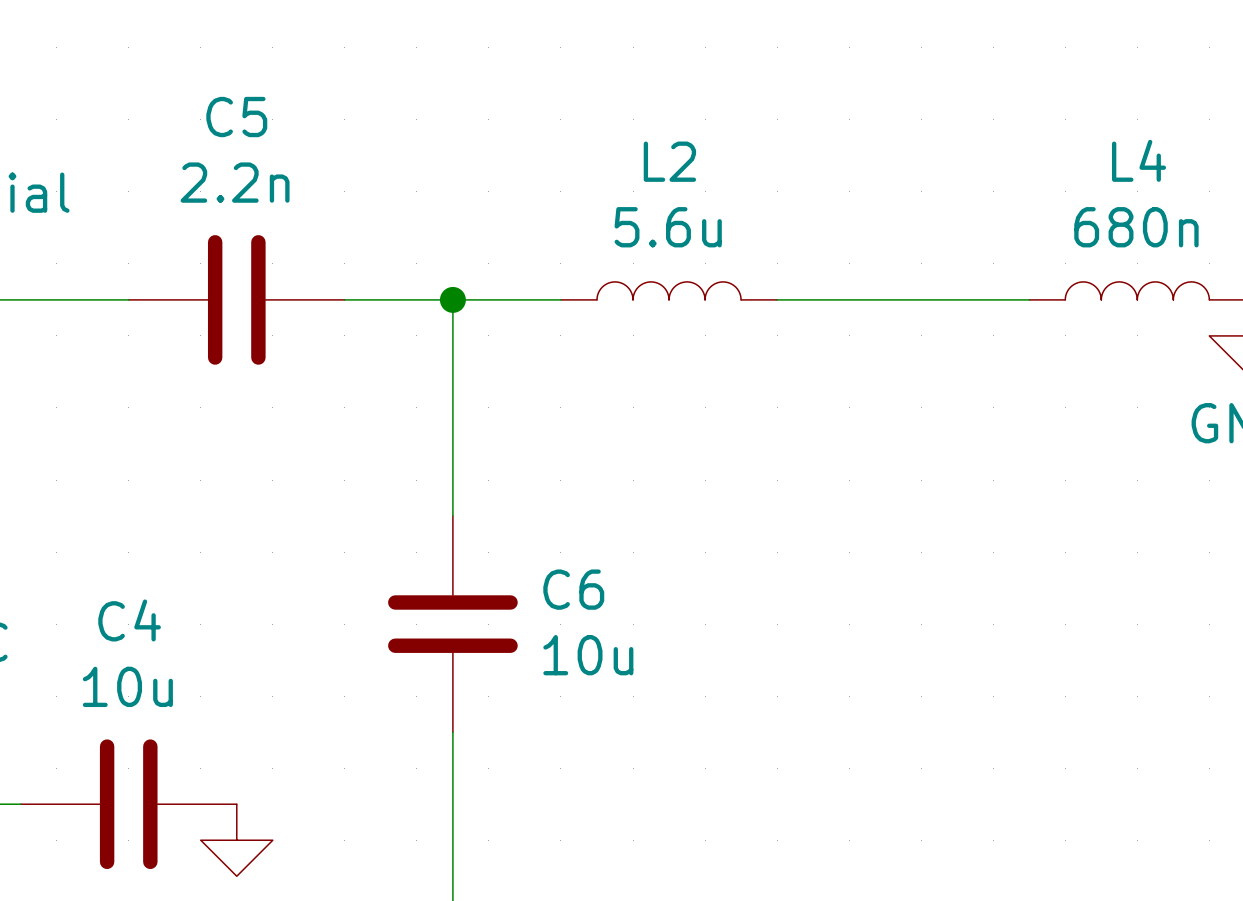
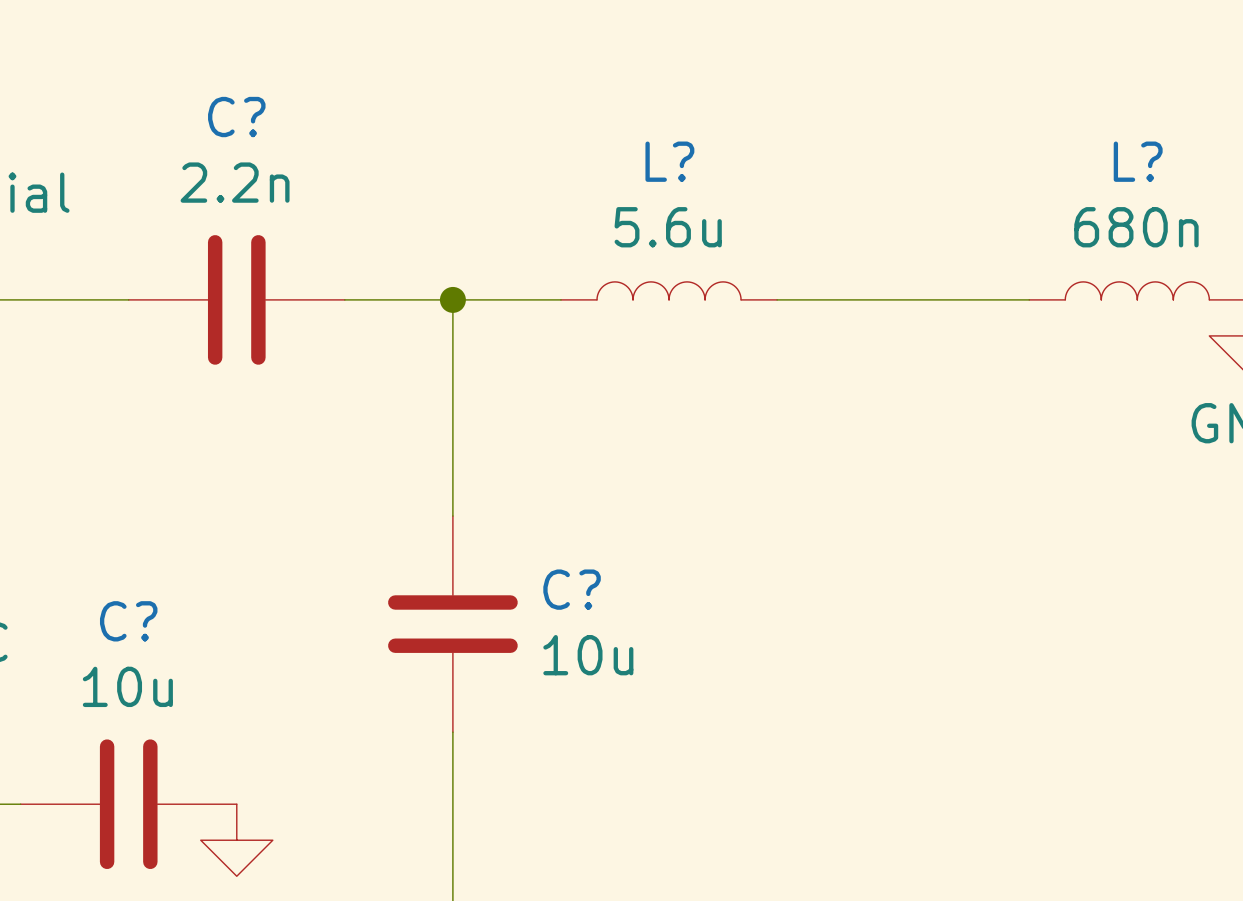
C5 name: C5 (236, 117) -> C? (236, 117)
L4 name: L4 (1139, 160) -> L? (1138, 161)
L2 name: L2 (669, 161) -> L? (669, 161)
C6 name: C6 (573, 589) -> C? (572, 589)
C4 name: C4 (129, 620) -> C? (128, 621)

